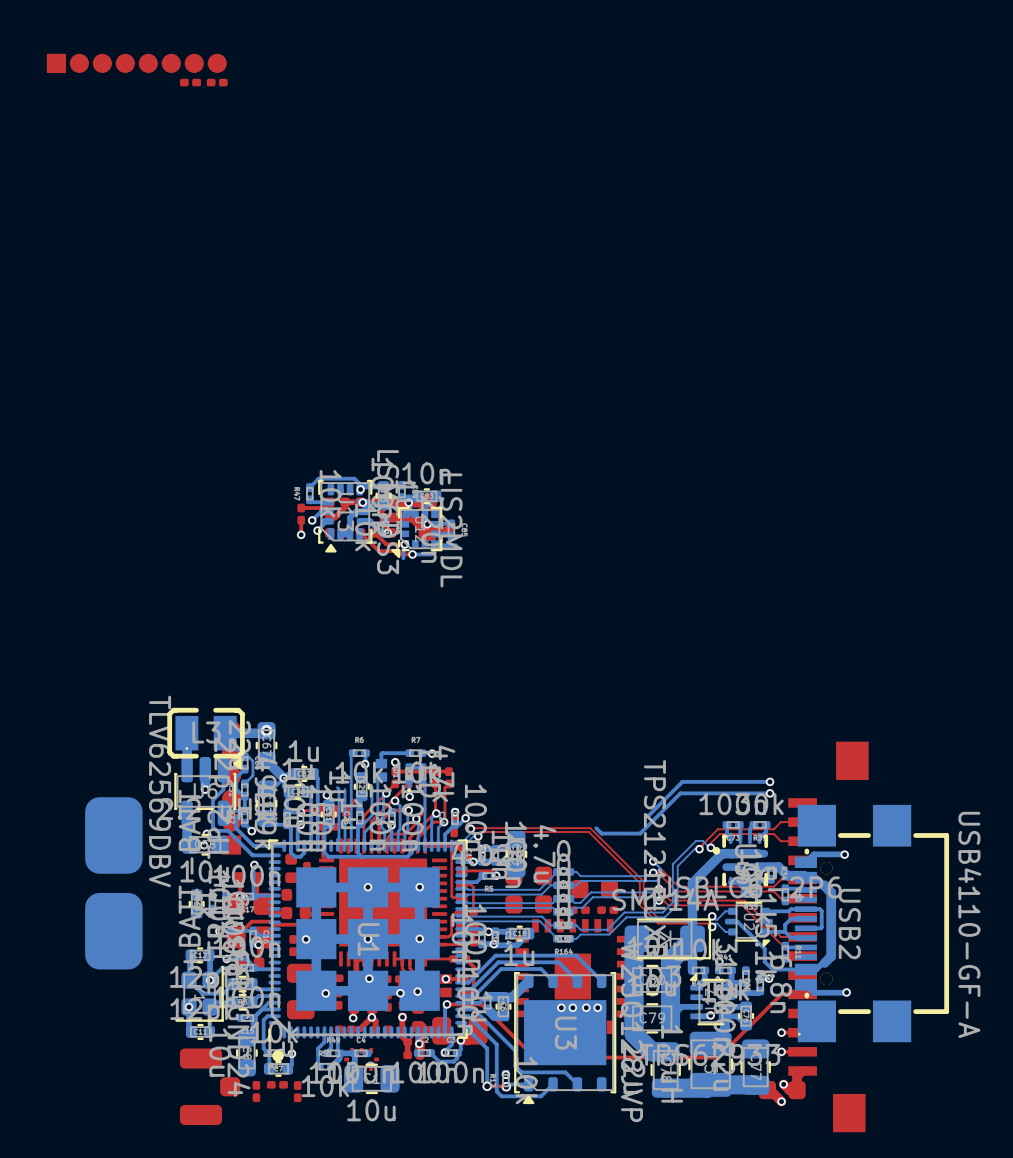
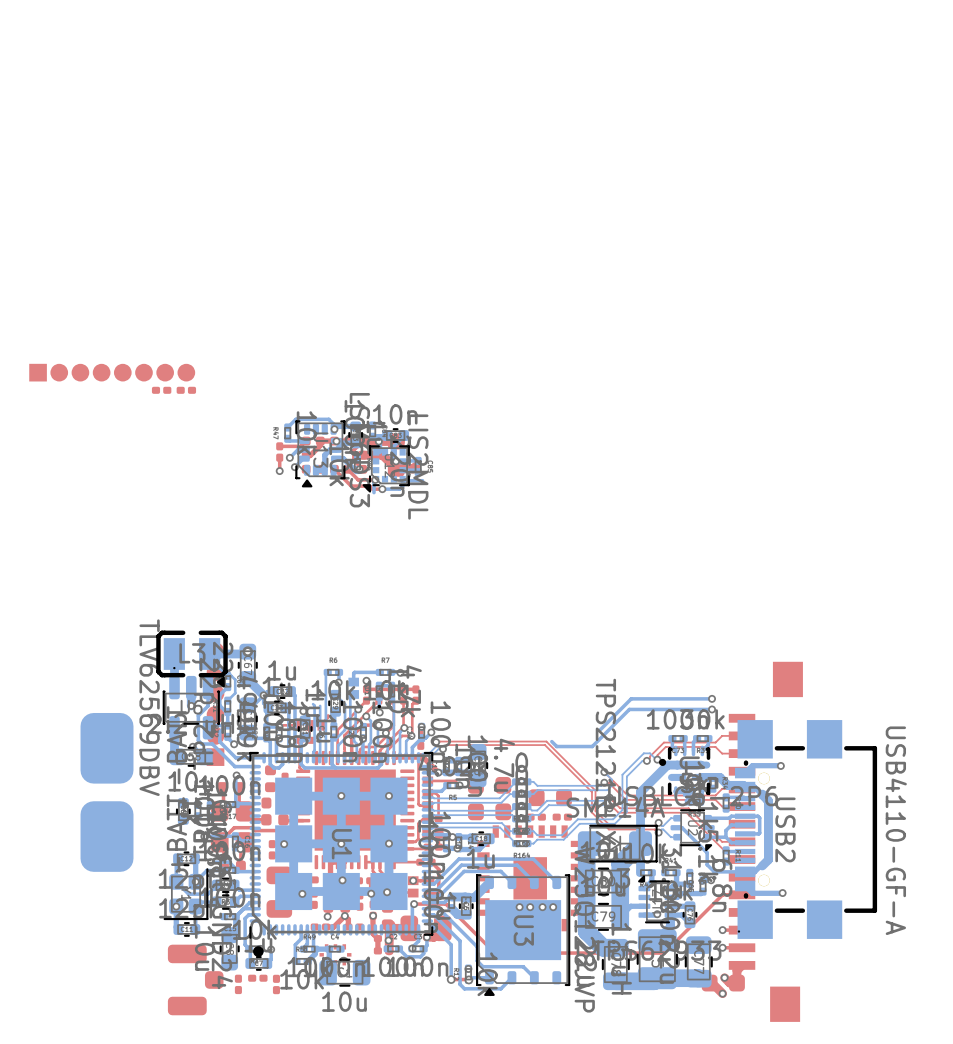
part position: (136, 63) -> (112, 372)
part: (190, 82) -> none
part: (217, 82) -> none
part: none -> (161, 390)
part: none -> (186, 390)

